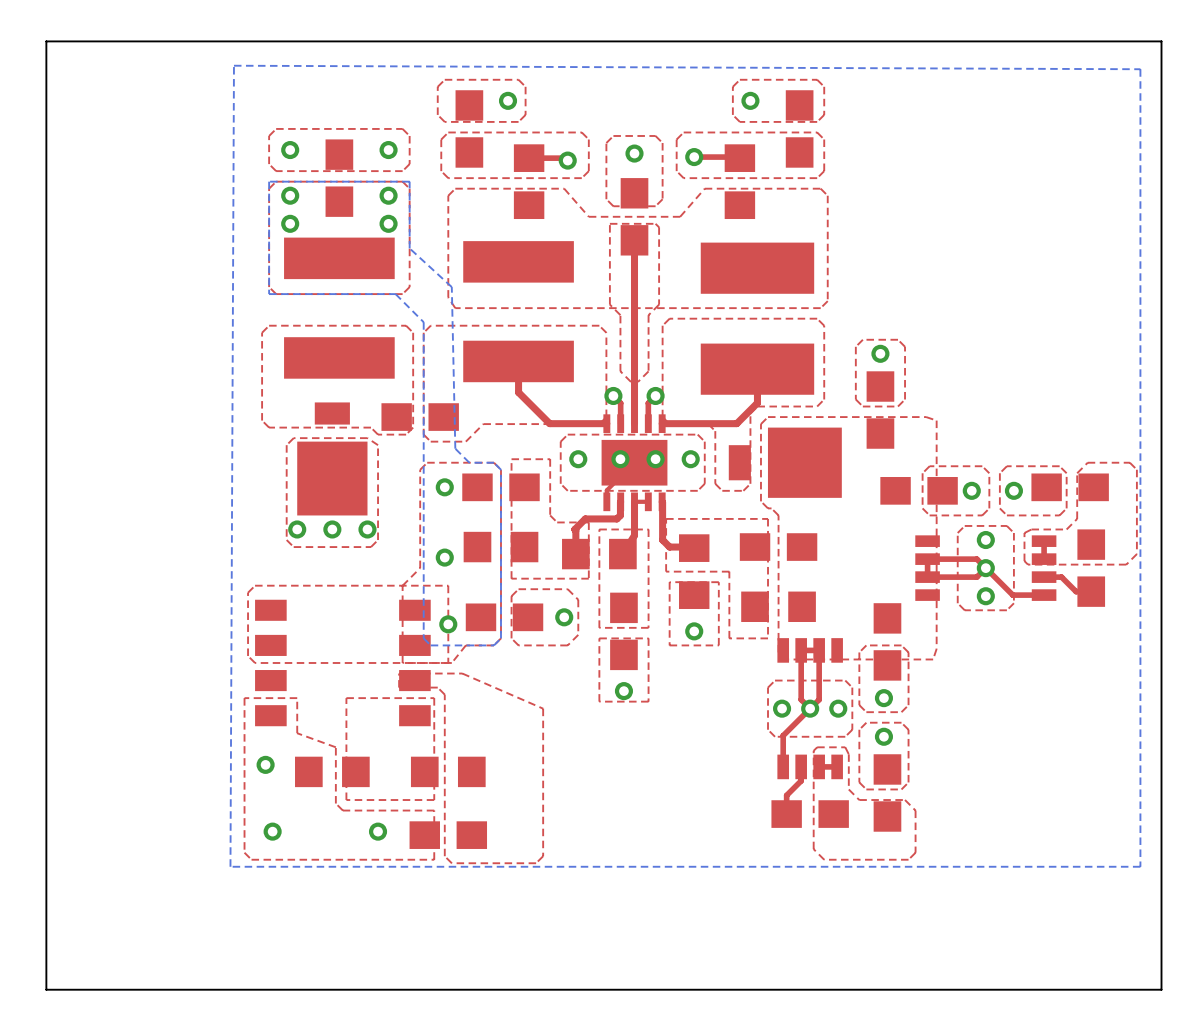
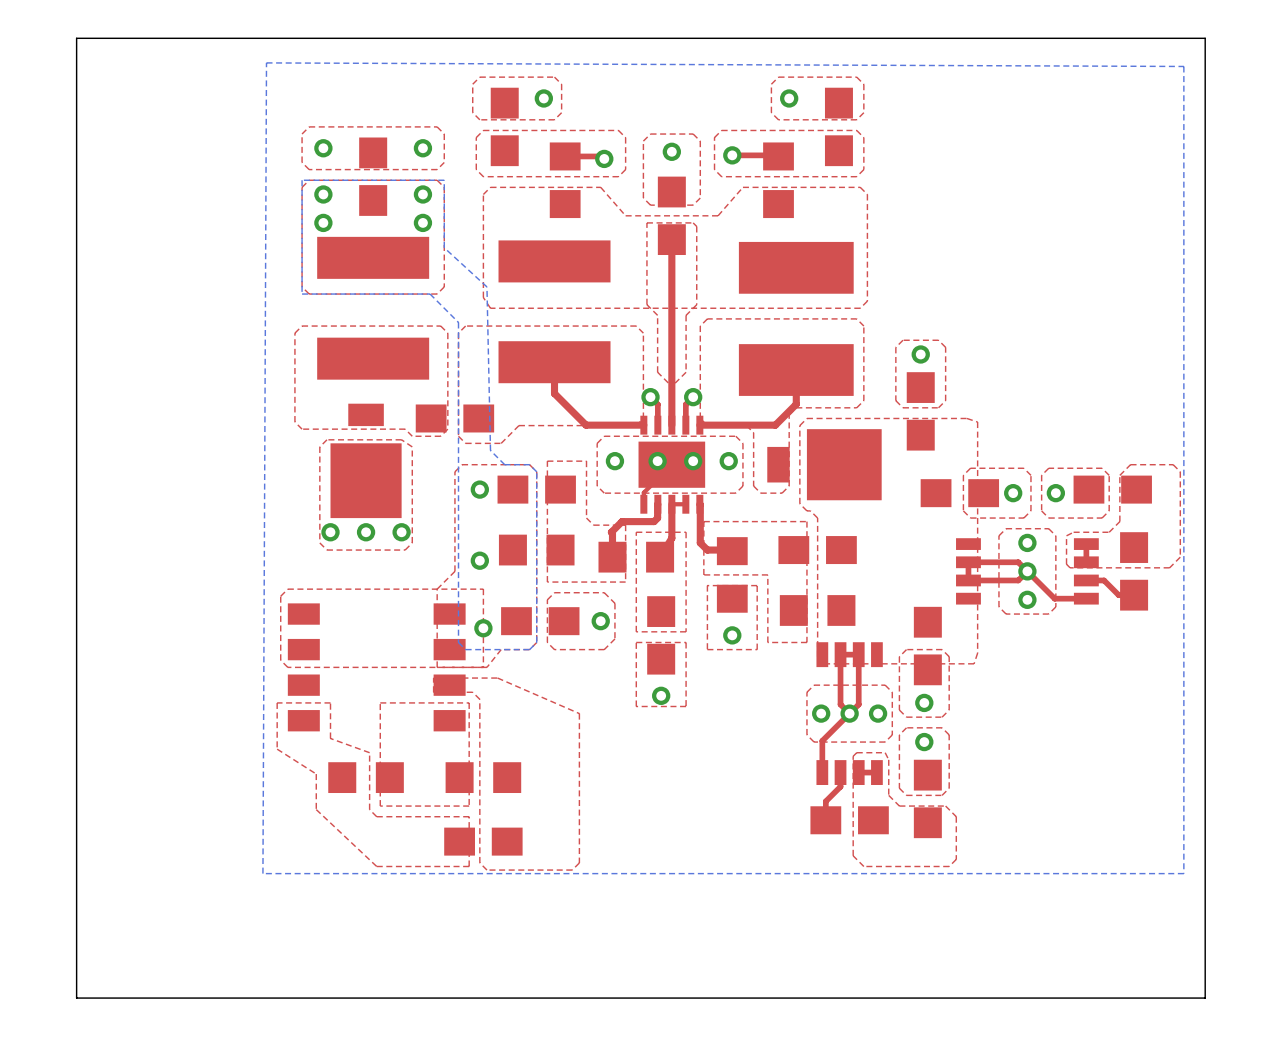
top zone outline: (244, 743) (244, 852) (251, 859) (342, 859) -> (277, 749) (316, 774) (316, 809) (376, 866)
via: (265, 764) -> none
via: (272, 831) -> none
via: (378, 831) -> none

